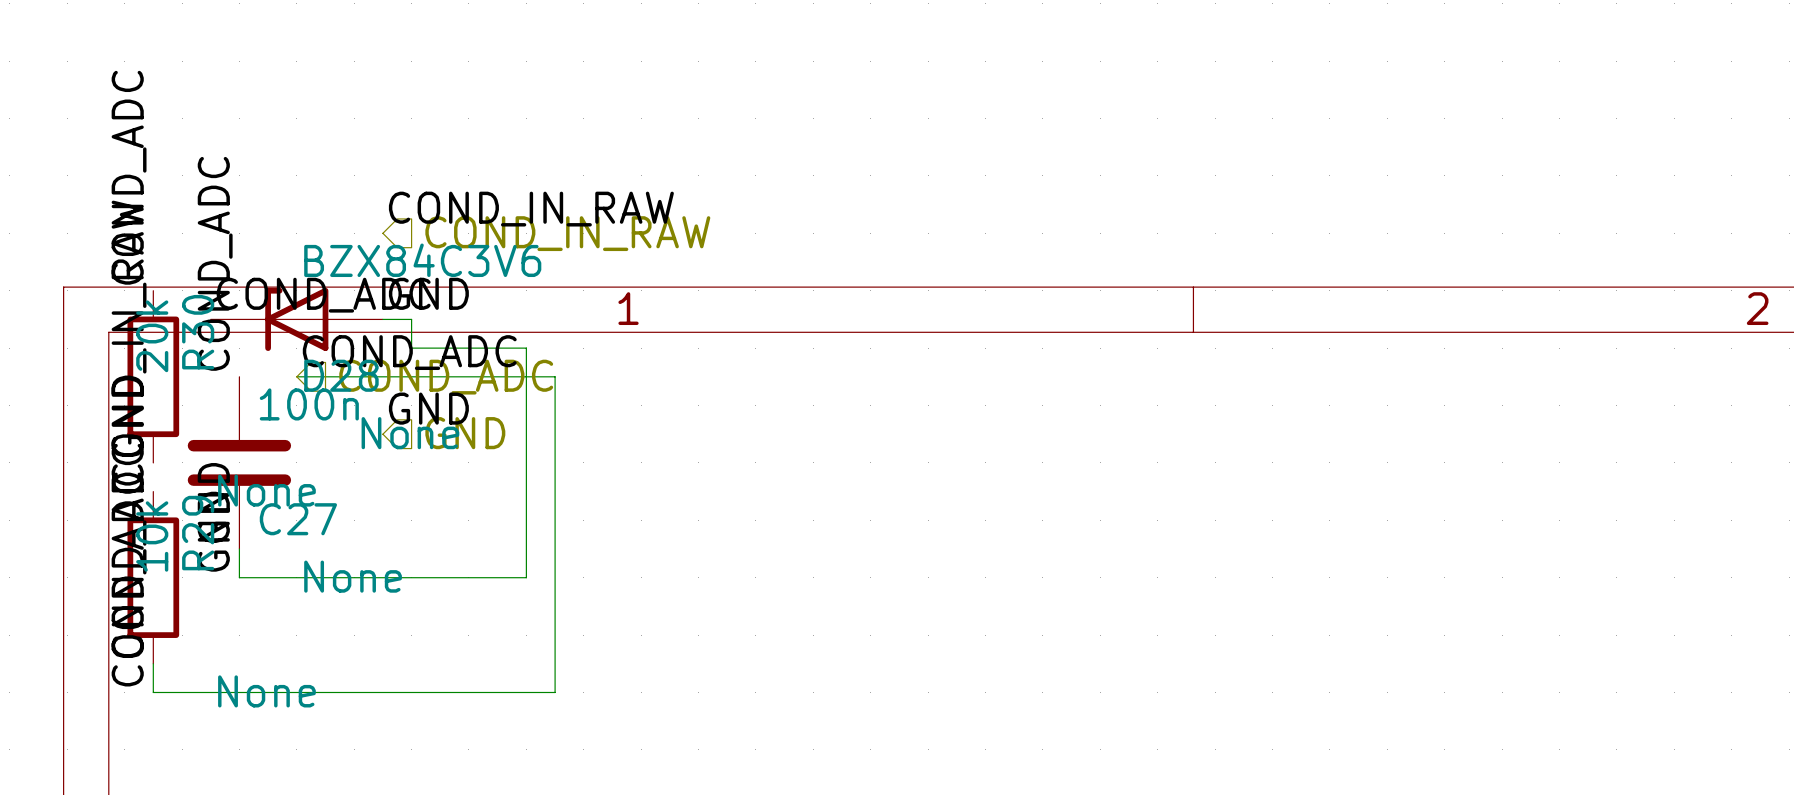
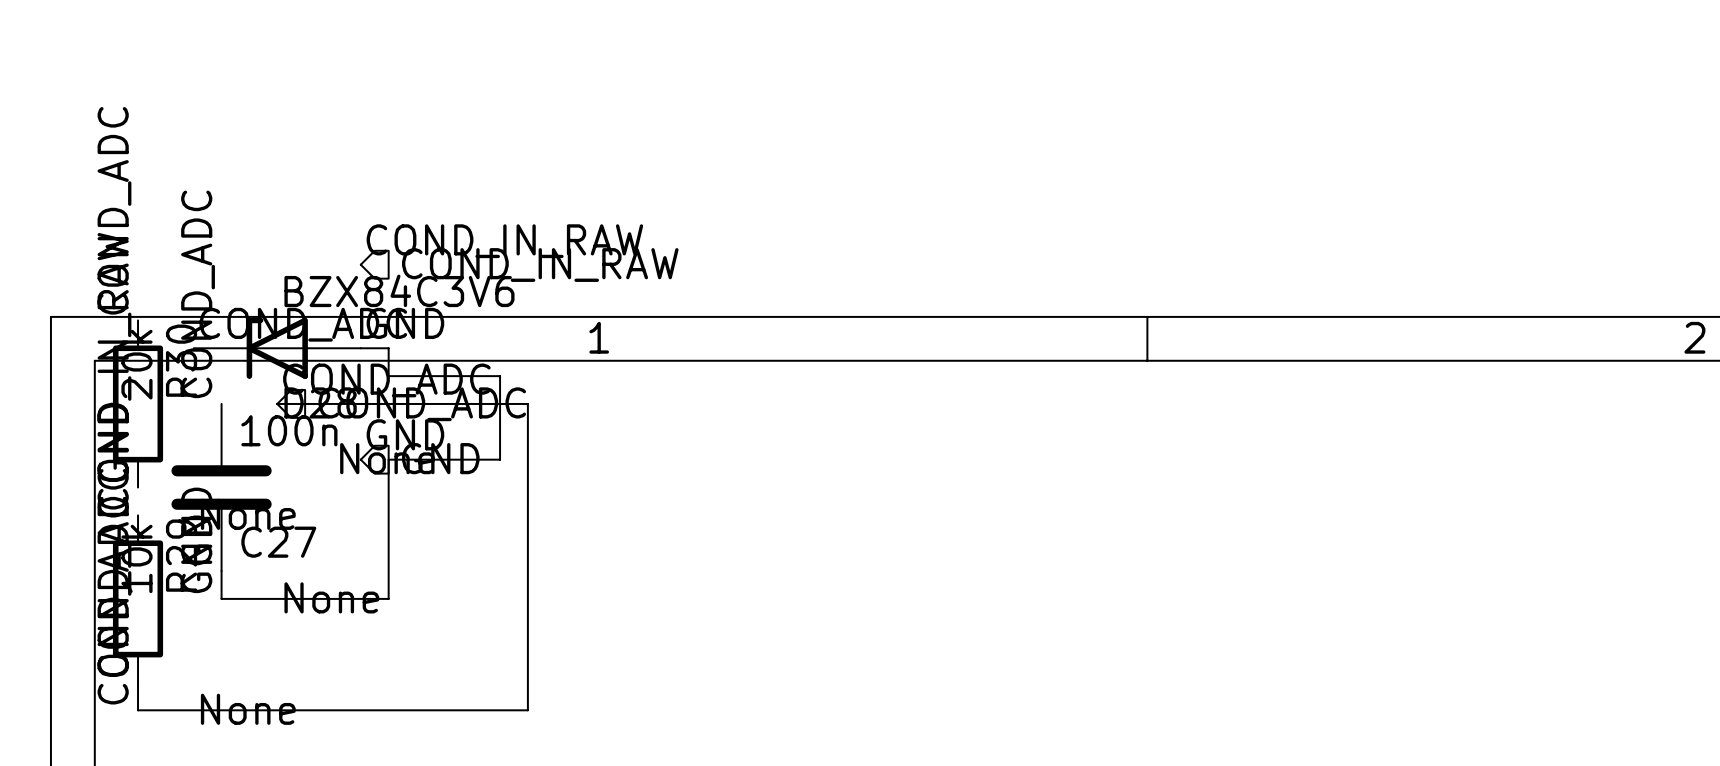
wire: (526, 434) (526, 577) (411, 577) -> (500, 459) (388, 459) (388, 598)

